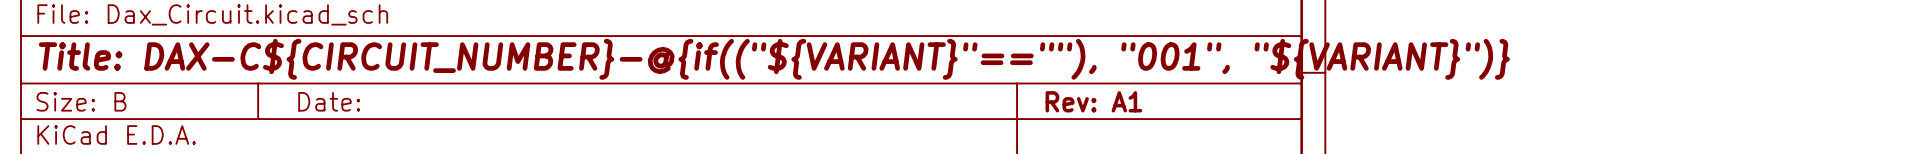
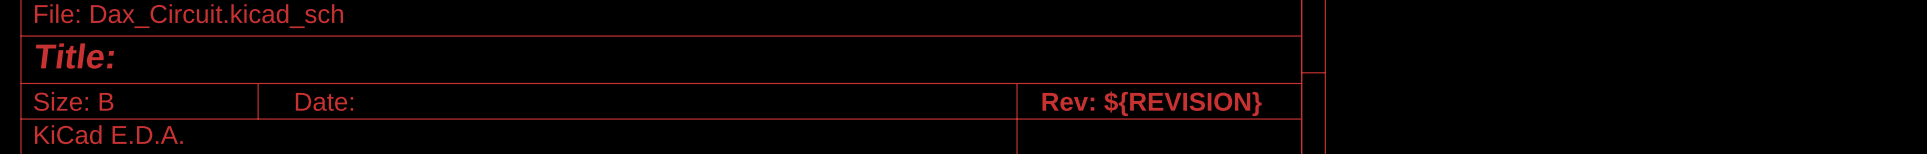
title block: Title: DAX-C${CIRCUIT_NUMBER}-@{if(("${VARIANT}"==""), "001", "${VARIANT}")} (774, 59) -> Title: (74, 56)
title block: Rev: A1 (1093, 101) -> Rev: ${REVISION} (1152, 103)

